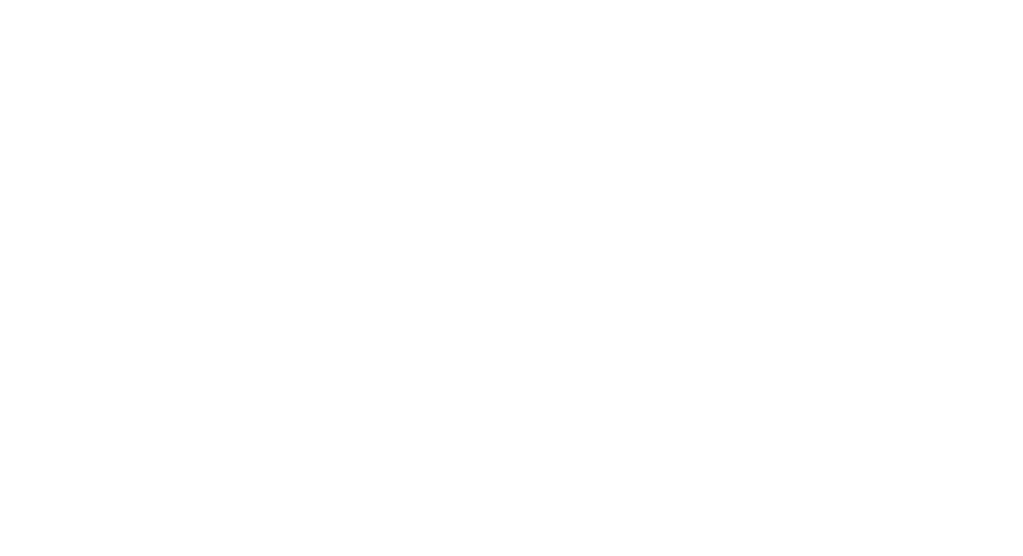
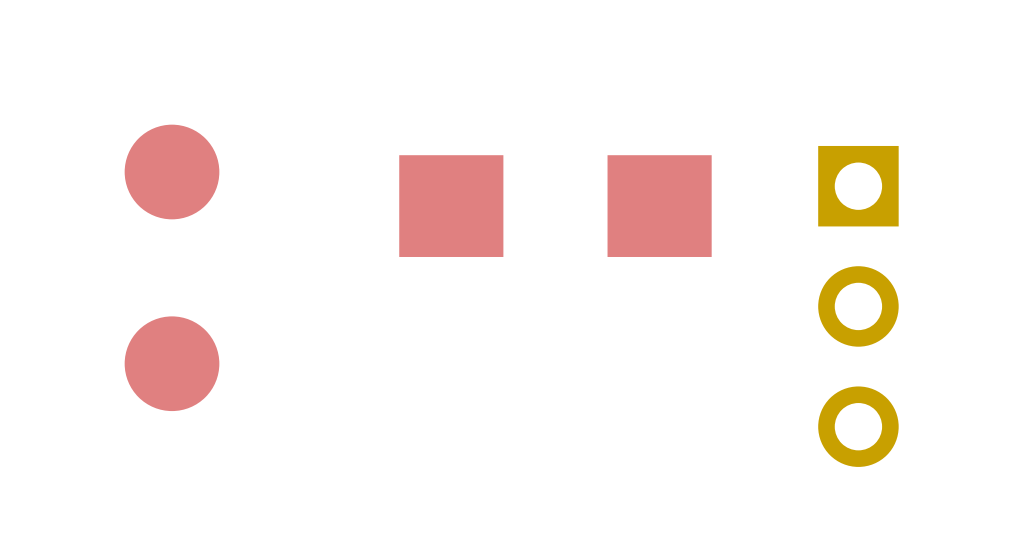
part: none -> (172, 172)
part: none -> (555, 206)
part: none -> (858, 306)
part: none -> (172, 363)

